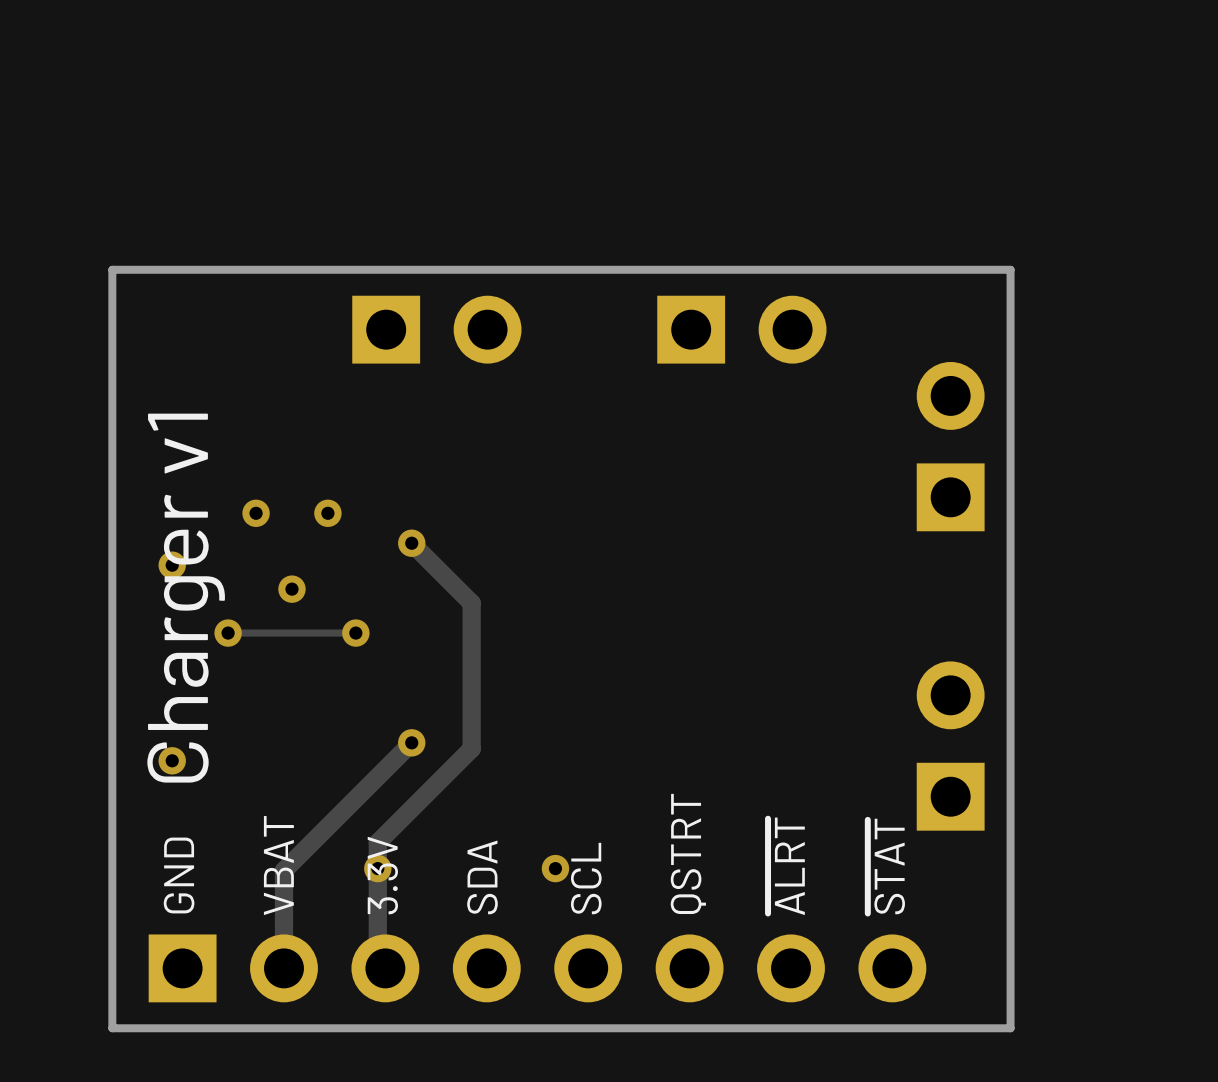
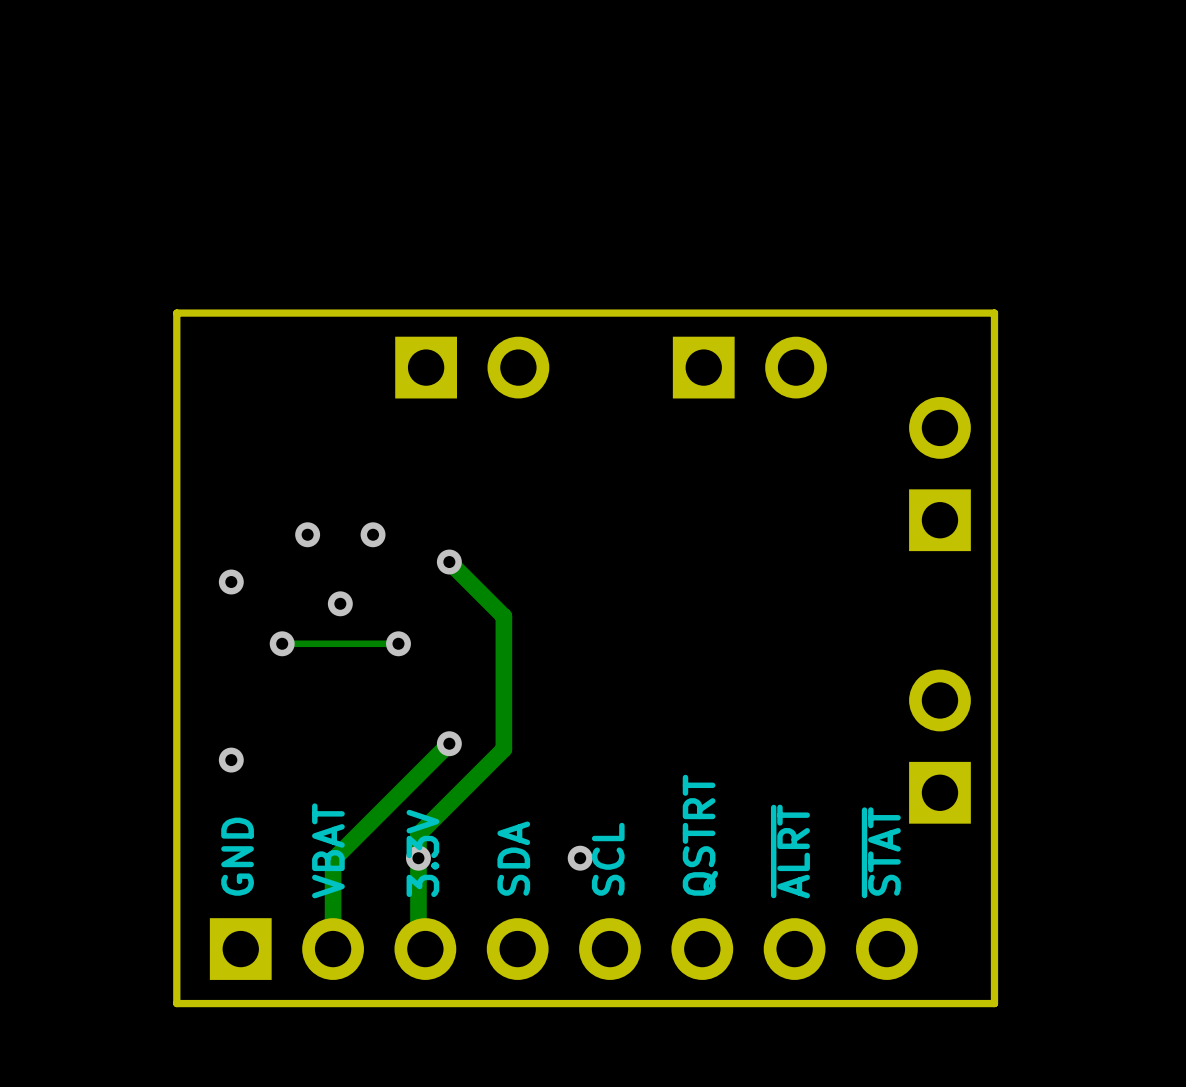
text: Charger v1 (186, 598) -> none

